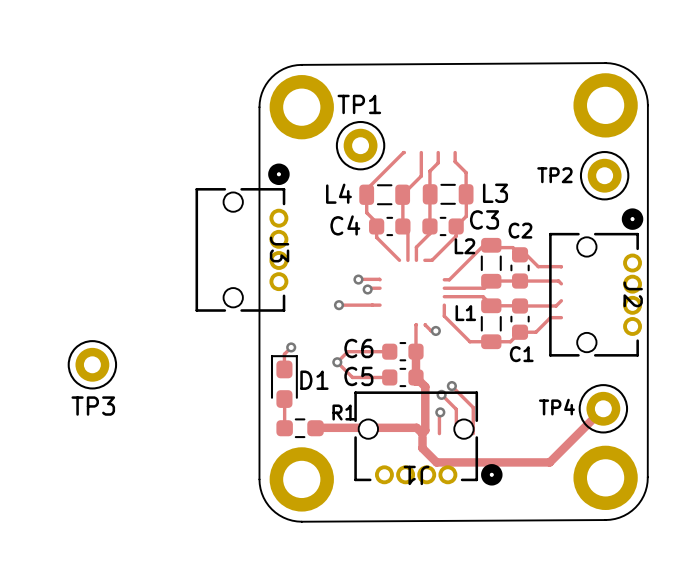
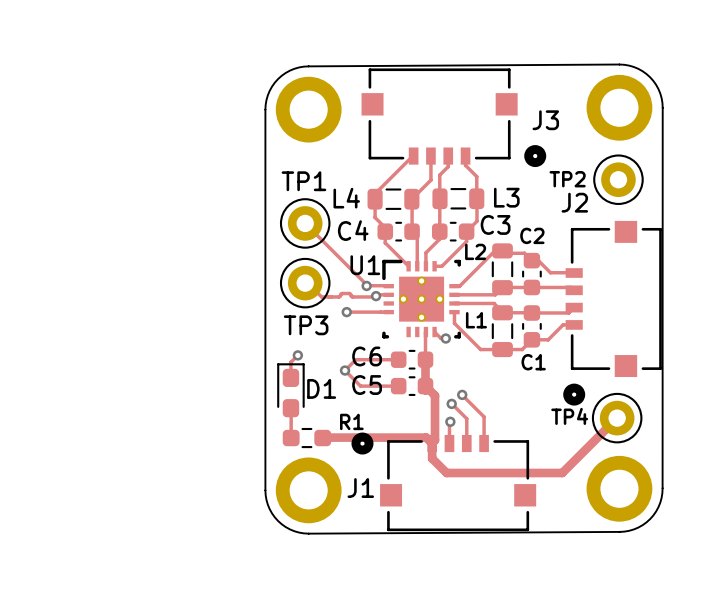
TP1 position: (360, 145) -> (305, 223)
J3 footprint: [195, 163, 290, 312] -> [361, 68, 547, 168]
J2 footprint: [549, 208, 644, 357] -> [563, 220, 662, 406]
track: none -> (305, 223) (366, 284)
J3 name position: J3 (279, 249) -> J3 (545, 120)
track: none -> (305, 283) (307, 283) (321, 296) (339, 296) (342, 293) (349, 293) (352, 296) (375, 296)
U1: none -> (421, 299)
J2 name position: J2 (633, 294) -> J2 (574, 202)
TP3 position: (92, 364) -> (305, 283)
J1 footprint: [354, 391, 503, 486] -> [351, 432, 537, 532]
J1 name position: J1 (416, 475) -> J1 (360, 488)

